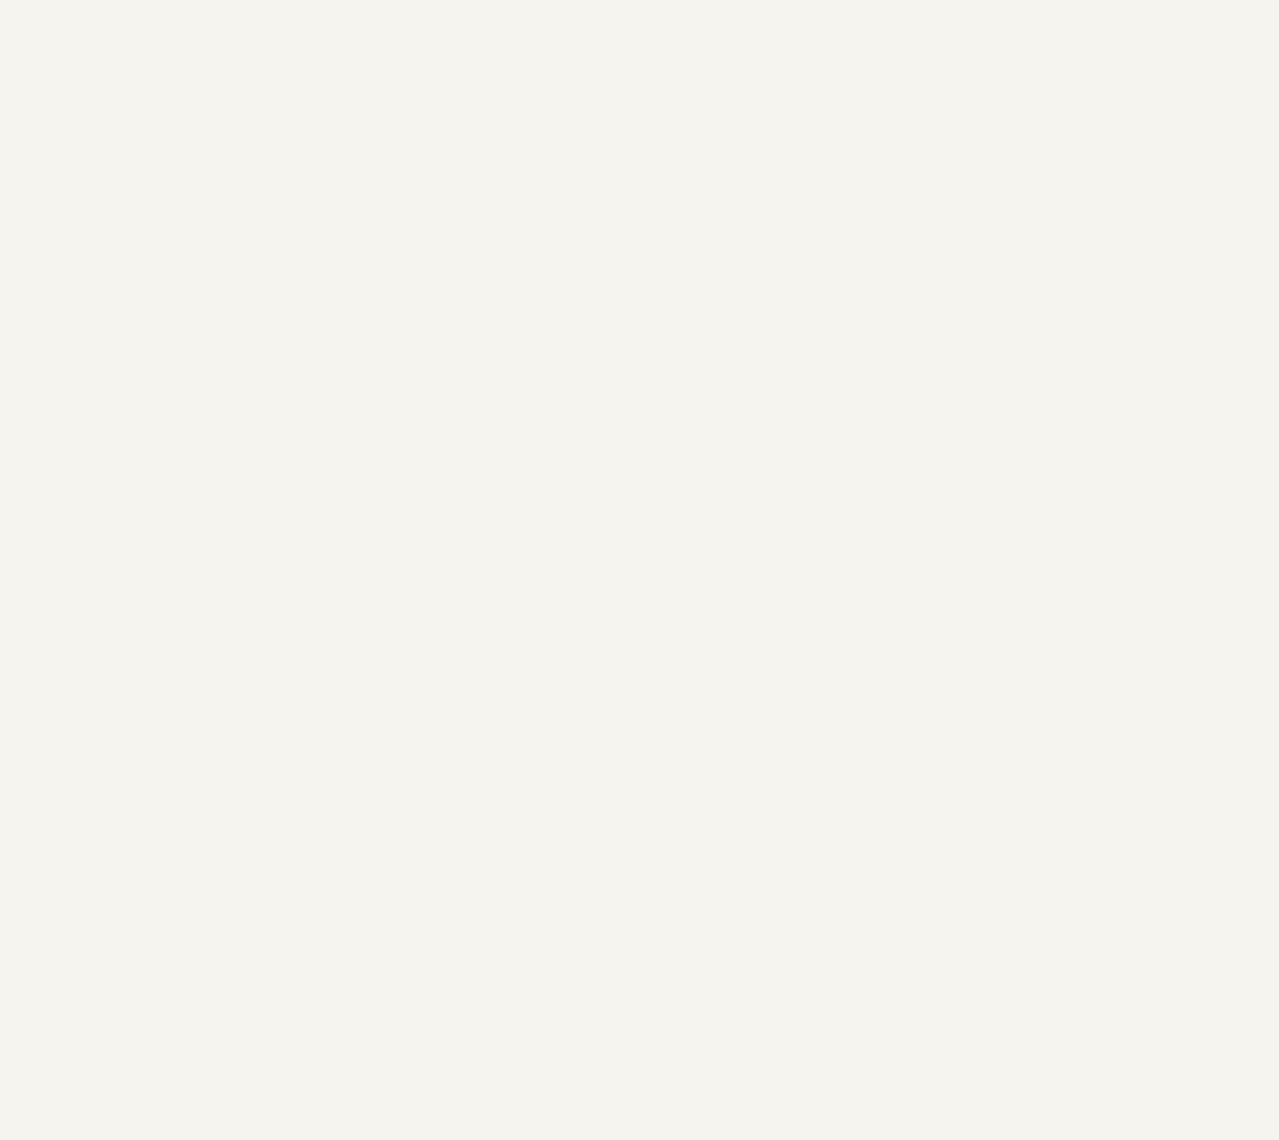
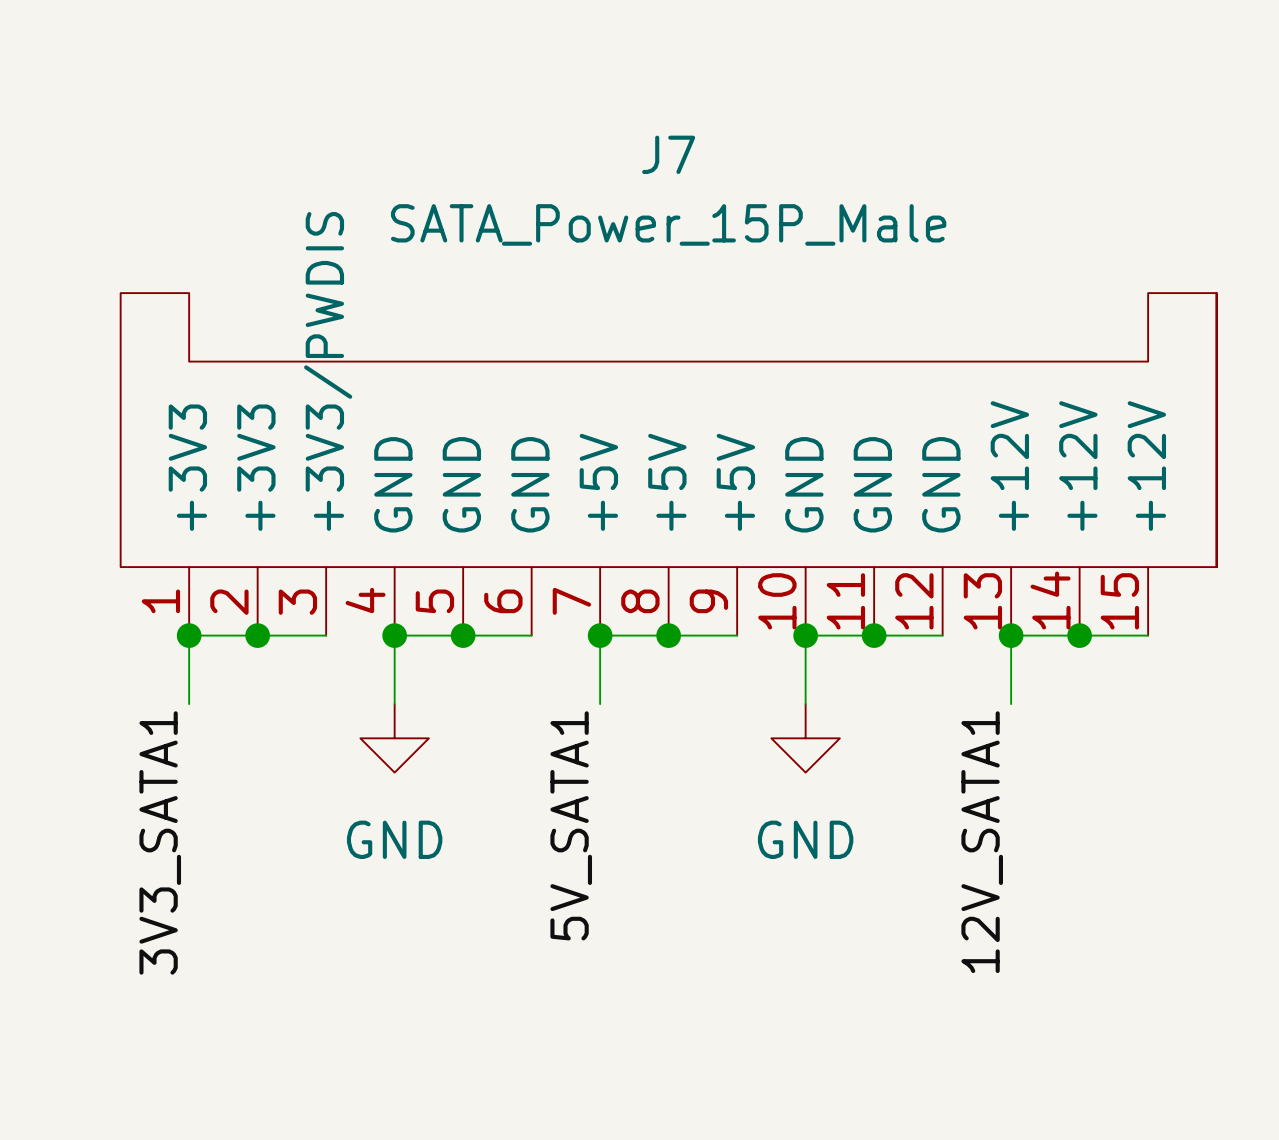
J7: none -> SATA_Power_15P_Male (668, 464)
junction: none -> (189, 635)
junction: none -> (257, 635)
wire: none -> (326, 635) (189, 635) (189, 704)
junction: none -> (394, 635)
junction: none -> (463, 635)
wire: none -> (531, 635) (394, 635) (394, 704)
junction: none -> (600, 635)
junction: none -> (668, 635)
wire: none -> (737, 635) (600, 635) (600, 704)
junction: none -> (805, 635)
junction: none -> (874, 635)
wire: none -> (942, 635) (805, 635) (805, 704)
junction: none -> (1011, 635)
junction: none -> (1079, 635)
wire: none -> (1148, 635) (1011, 635) (1011, 704)
power symbol: none -> GND (394, 738)
power symbol: none -> GND (805, 738)
label: none -> 5V_SATA1 (571, 825)
label: none -> 3V3_SATA1 (160, 842)
label: none -> 12V_SATA1 (982, 842)

